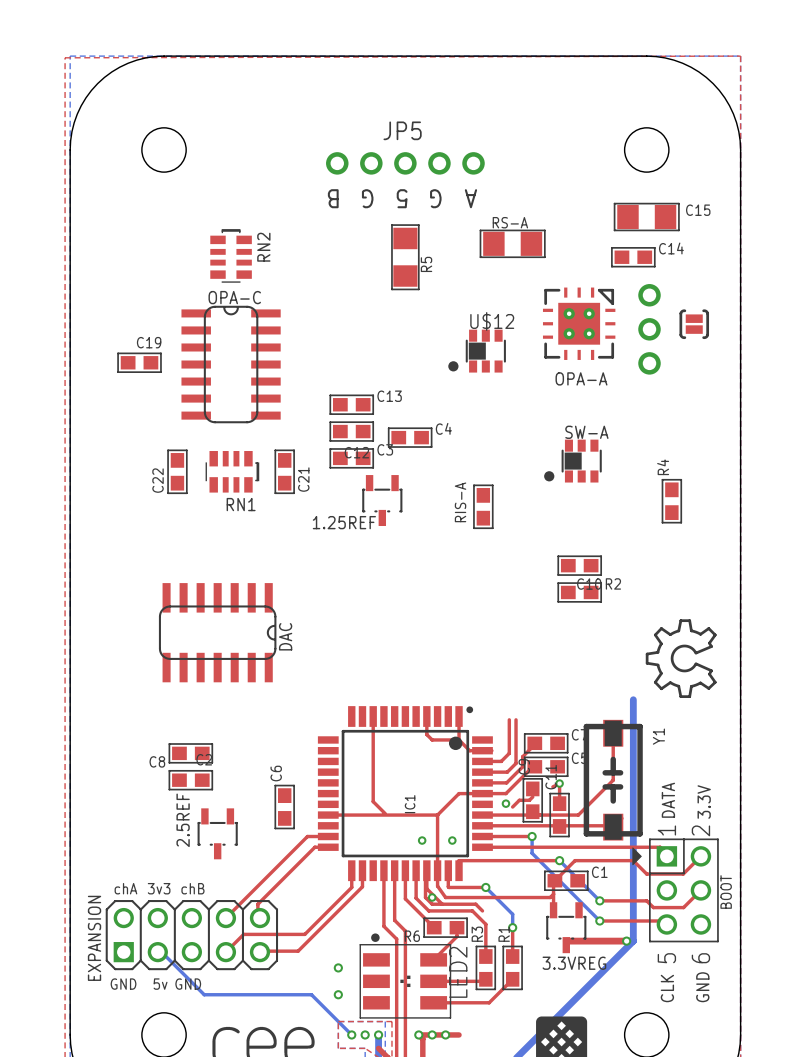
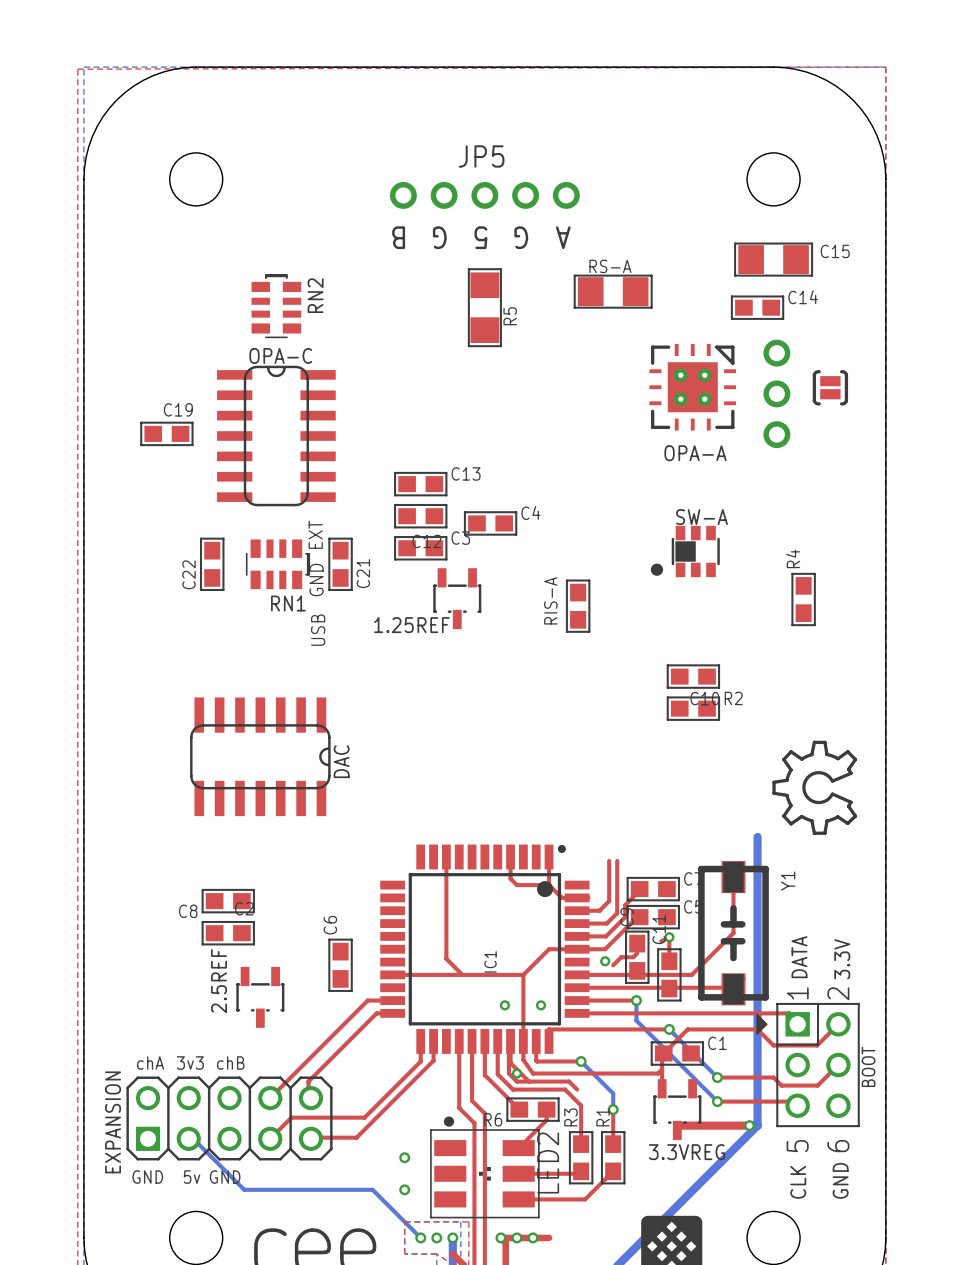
U$12: (477, 351) -> none
text: none -> EXT (315, 534)
text: none -> GND (316, 580)
text: none -> USB (318, 630)

